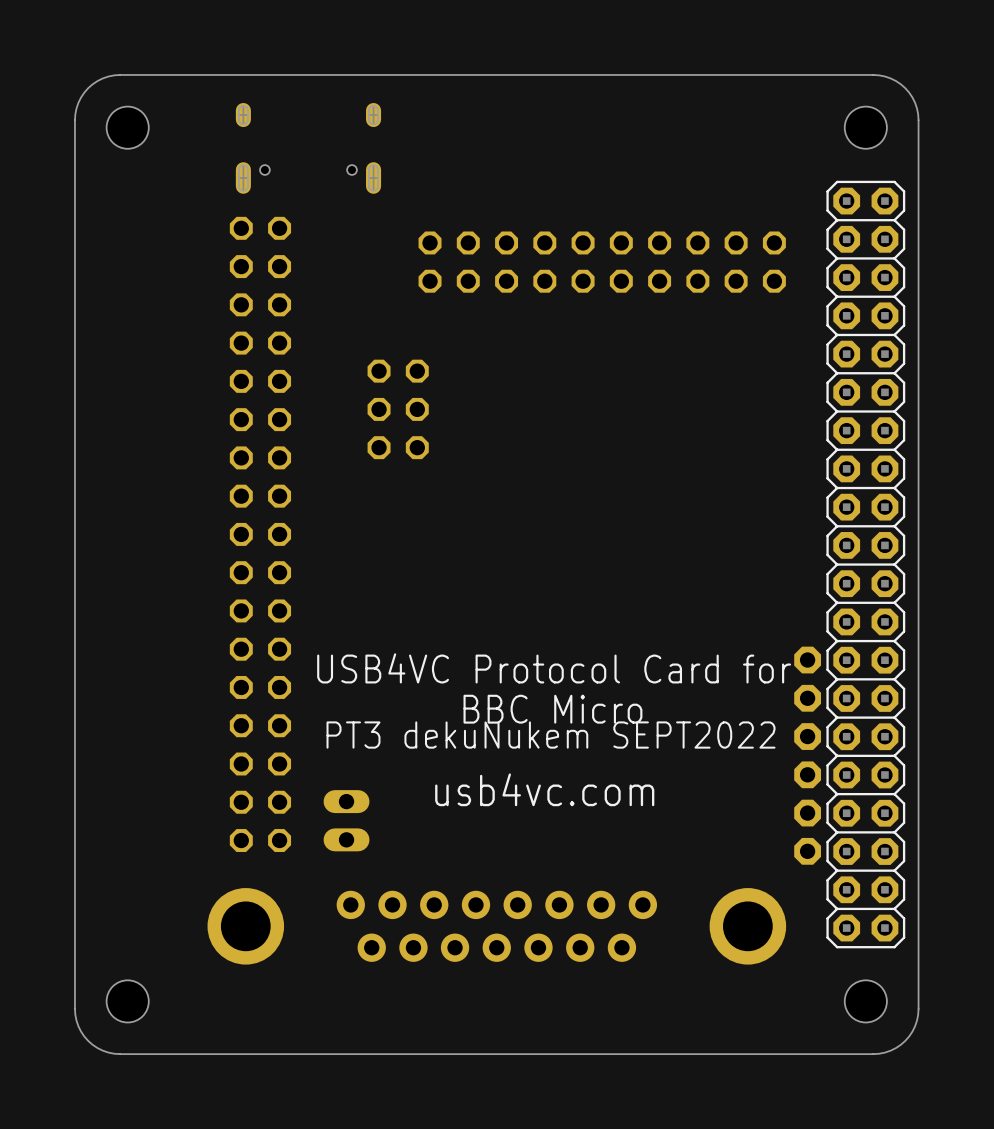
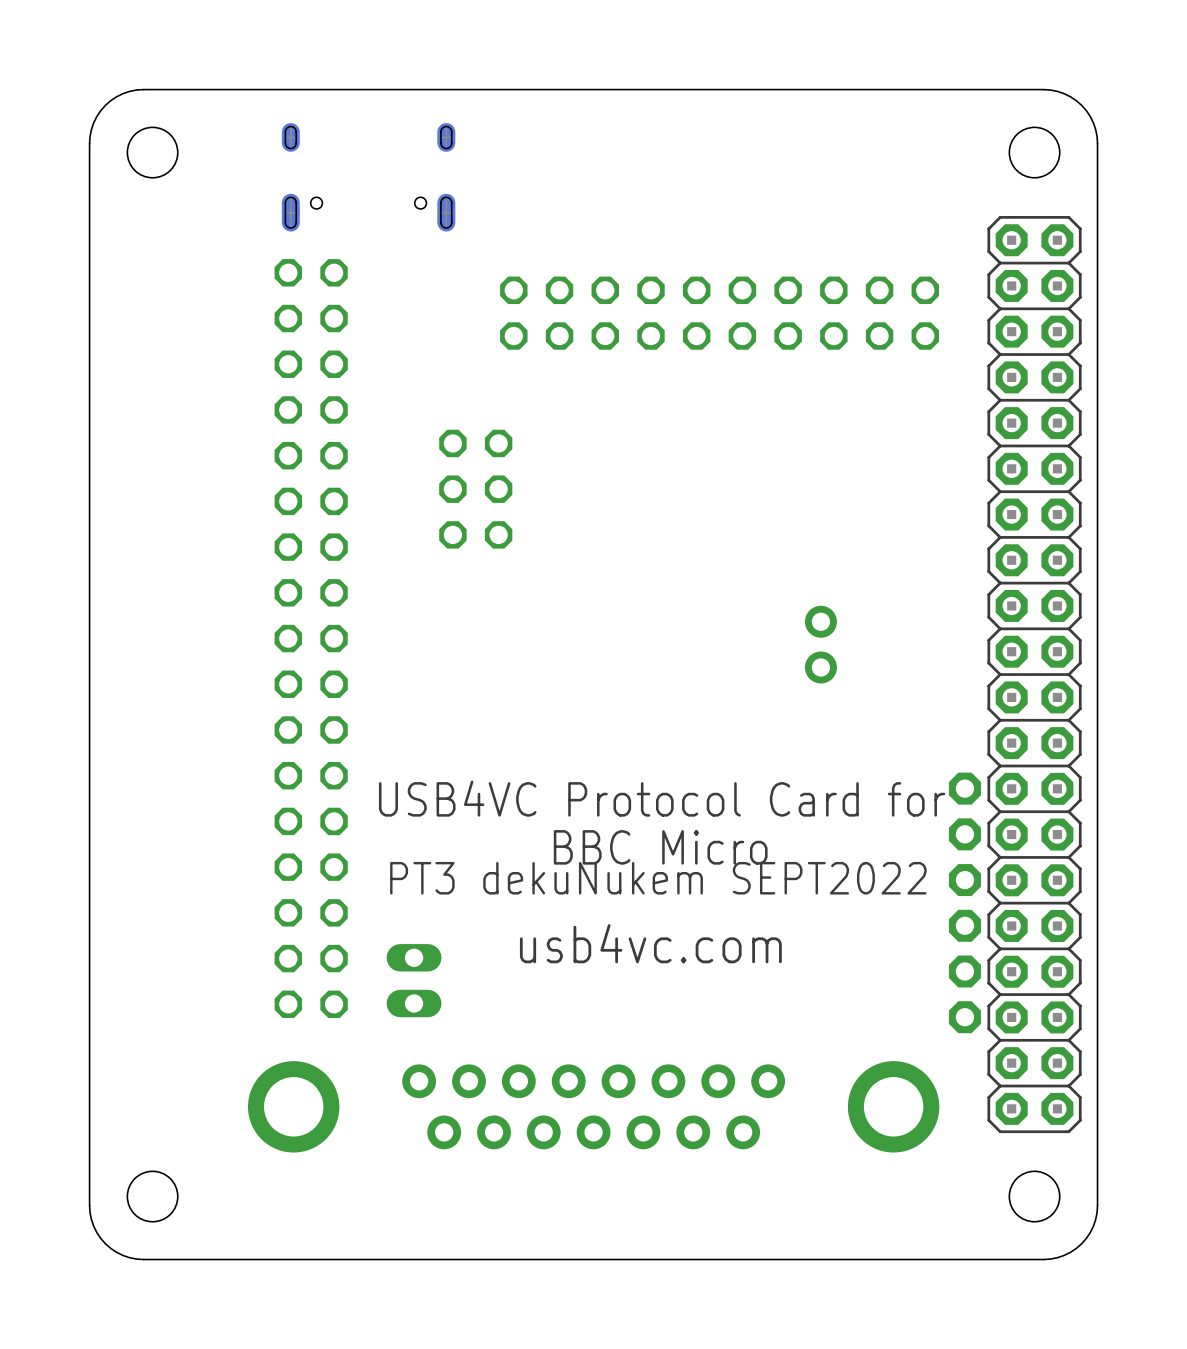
part: none -> (820, 621)
part: none -> (820, 667)

